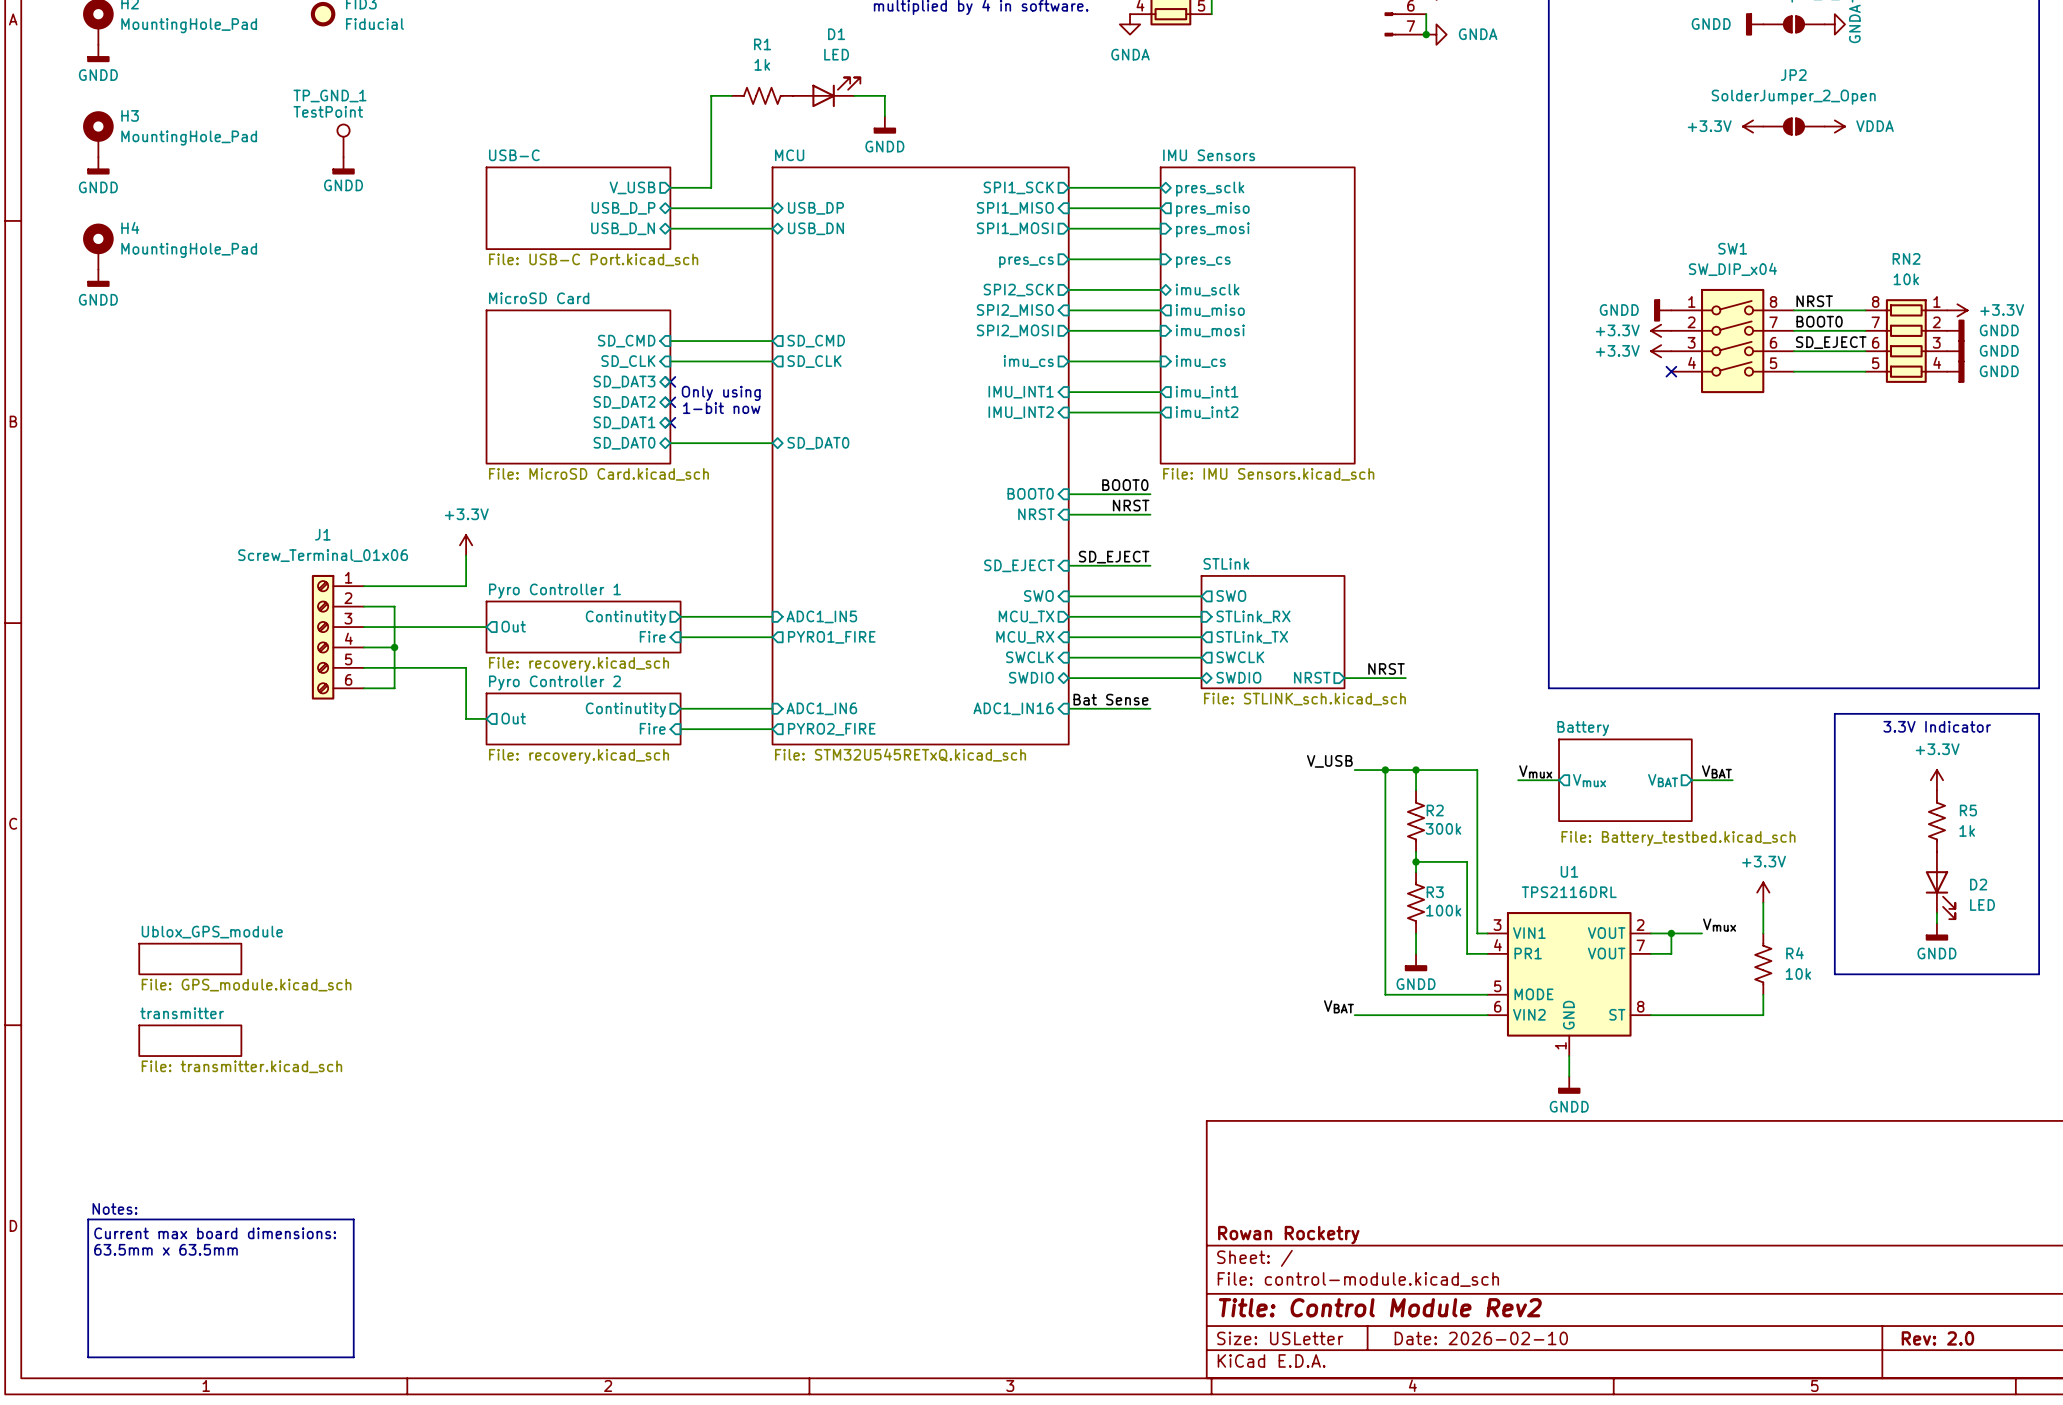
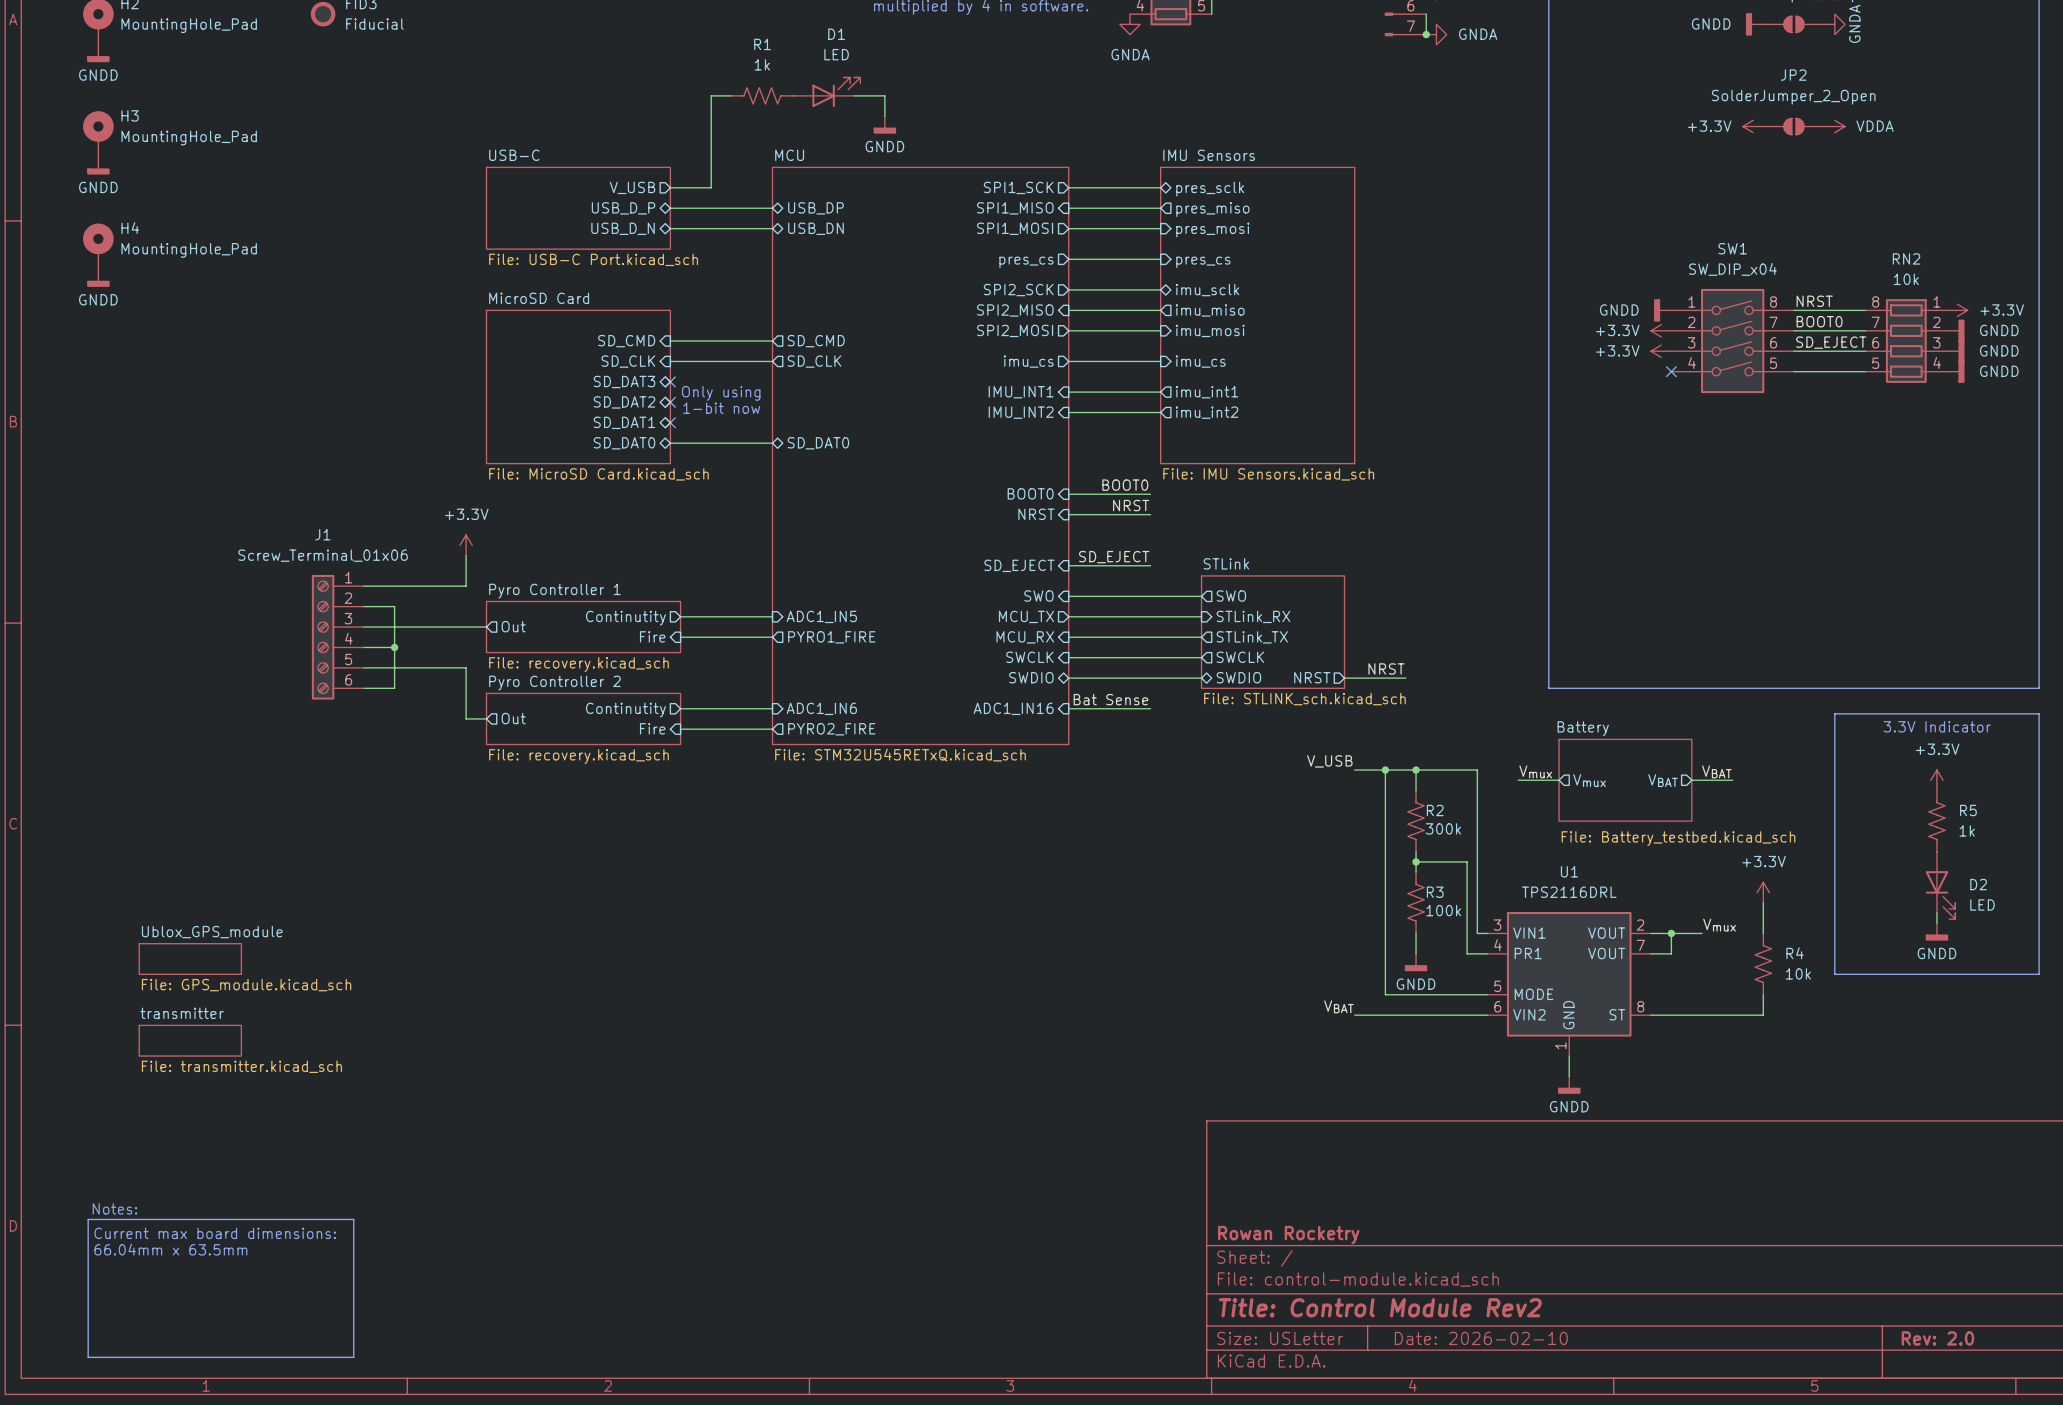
TP_GND_1: TestPoint (343, 140) -> none
power symbol: GNDD (343, 165) -> none
text: 63.5mm x 63.5mm (166, 1249) -> 66.04mm x 63.5mm (170, 1249)

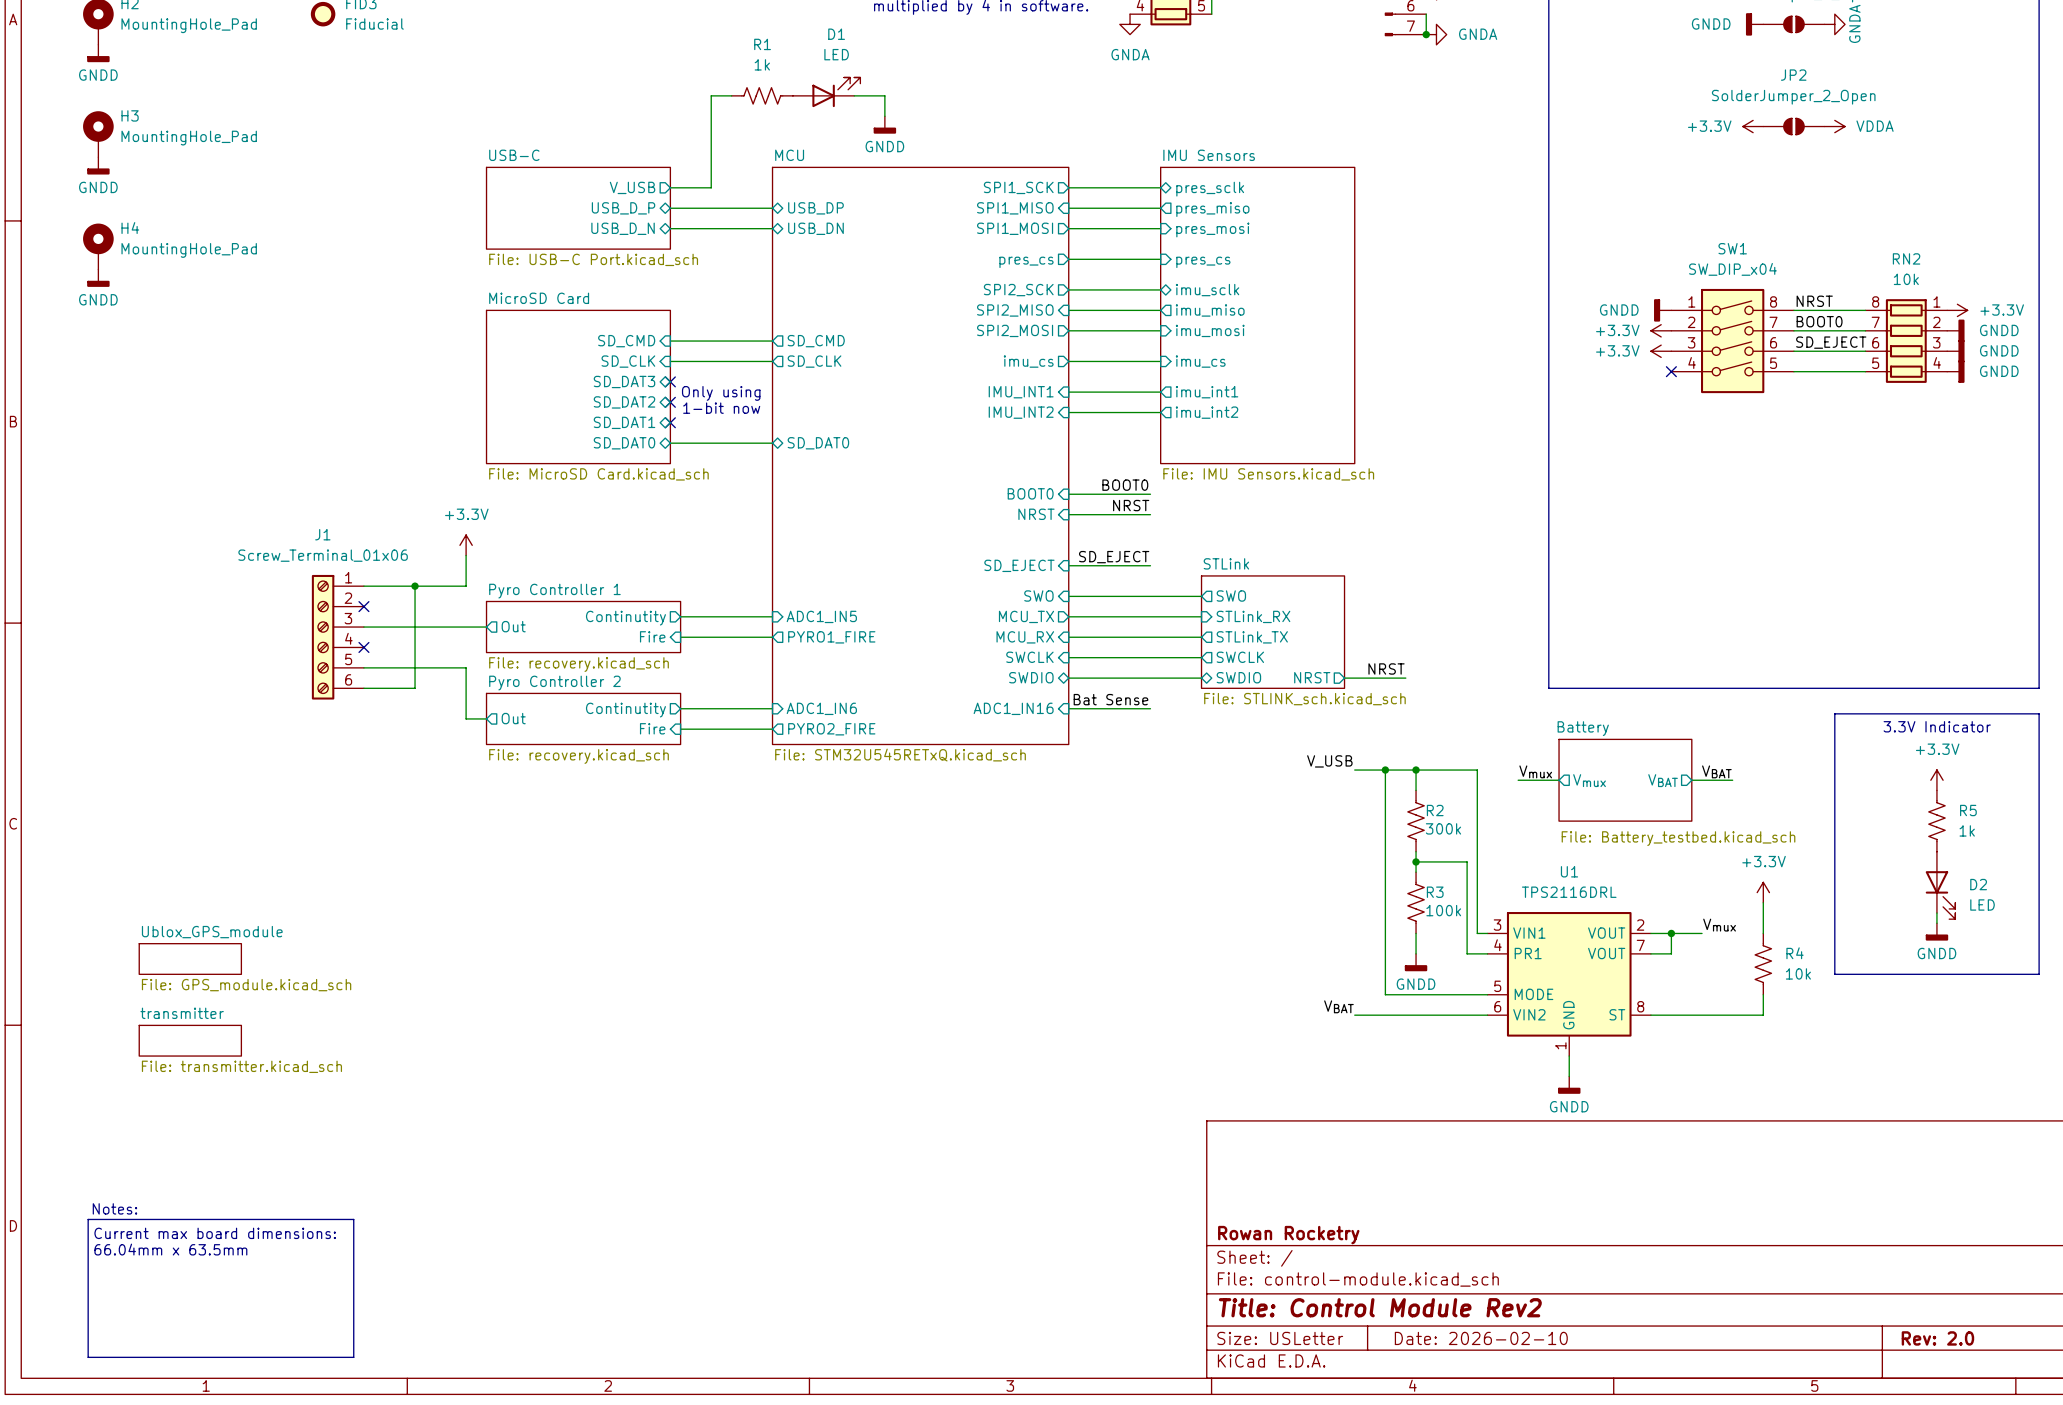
junction: none -> (415, 586)
wire: (363, 606) (394, 606) (394, 688) -> (415, 586) (415, 688) (394, 688)
no-connect mark: none -> (363, 606)
wire: (363, 647) (394, 647) -> none
no-connect mark: none -> (363, 647)
junction: (394, 647) -> none

